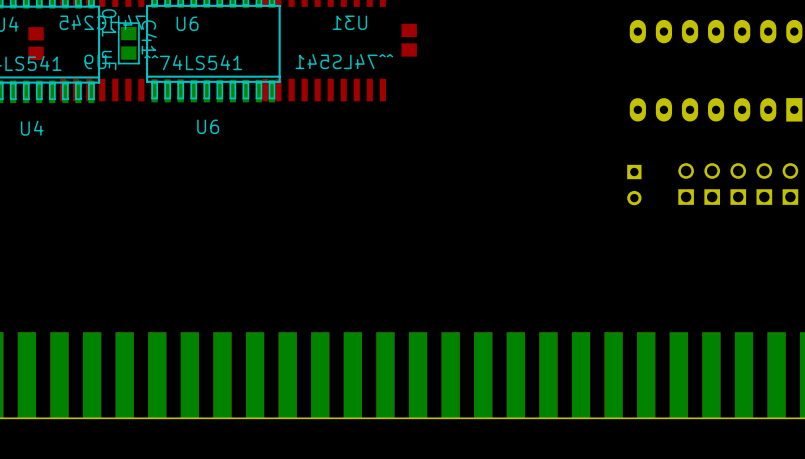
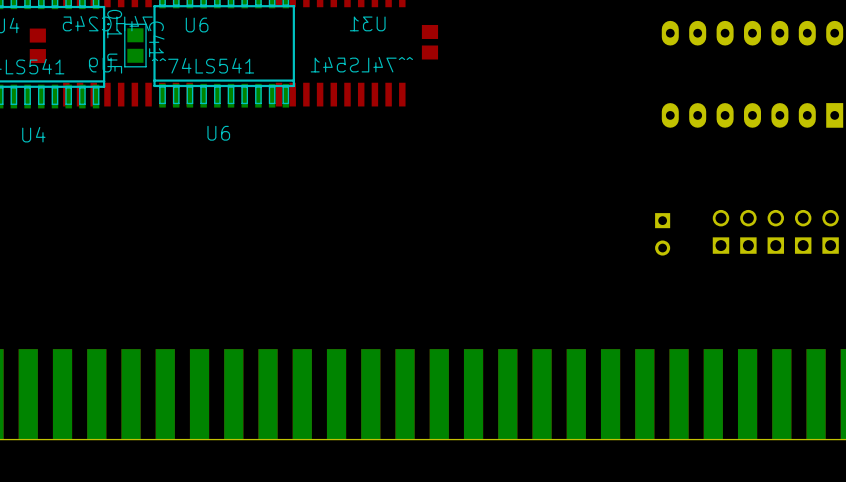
part: (686, 184) -> none
part: (712, 184) -> none
part: (738, 184) -> none
part: (764, 184) -> none
part: (790, 184) -> none
part position: (634, 185) -> (662, 234)
part: none -> (720, 231)
part: none -> (748, 231)
part: none -> (775, 231)
part: none -> (803, 231)
part: none -> (830, 231)

